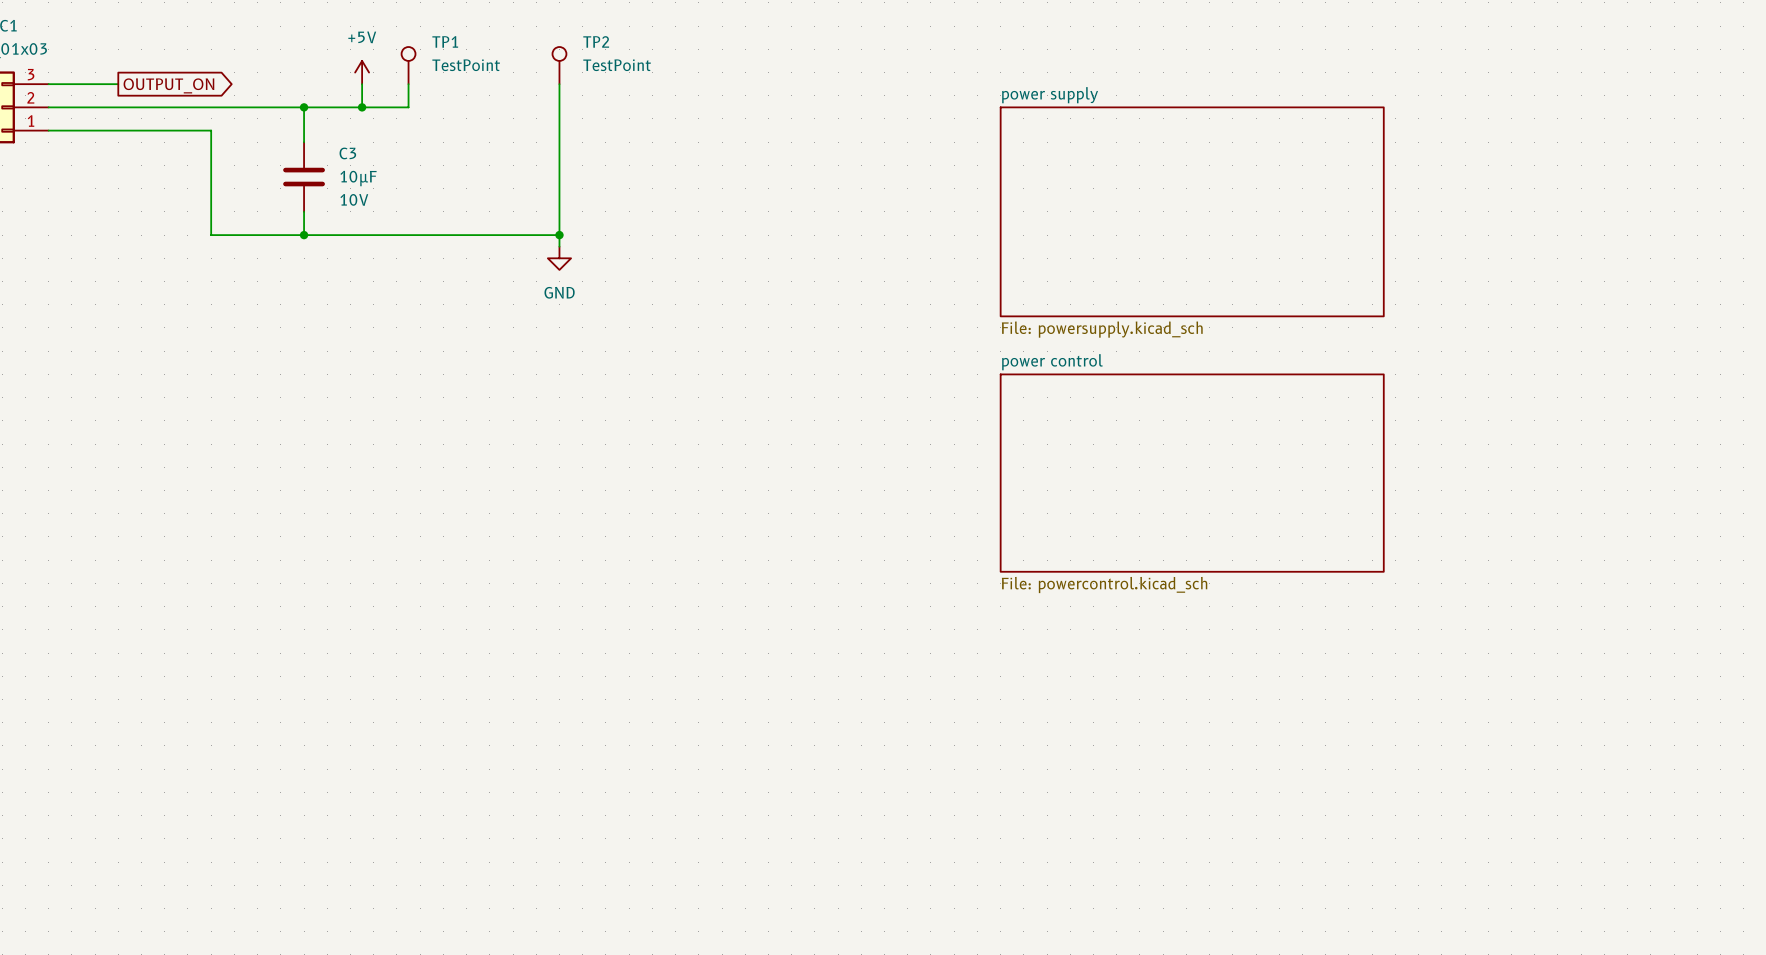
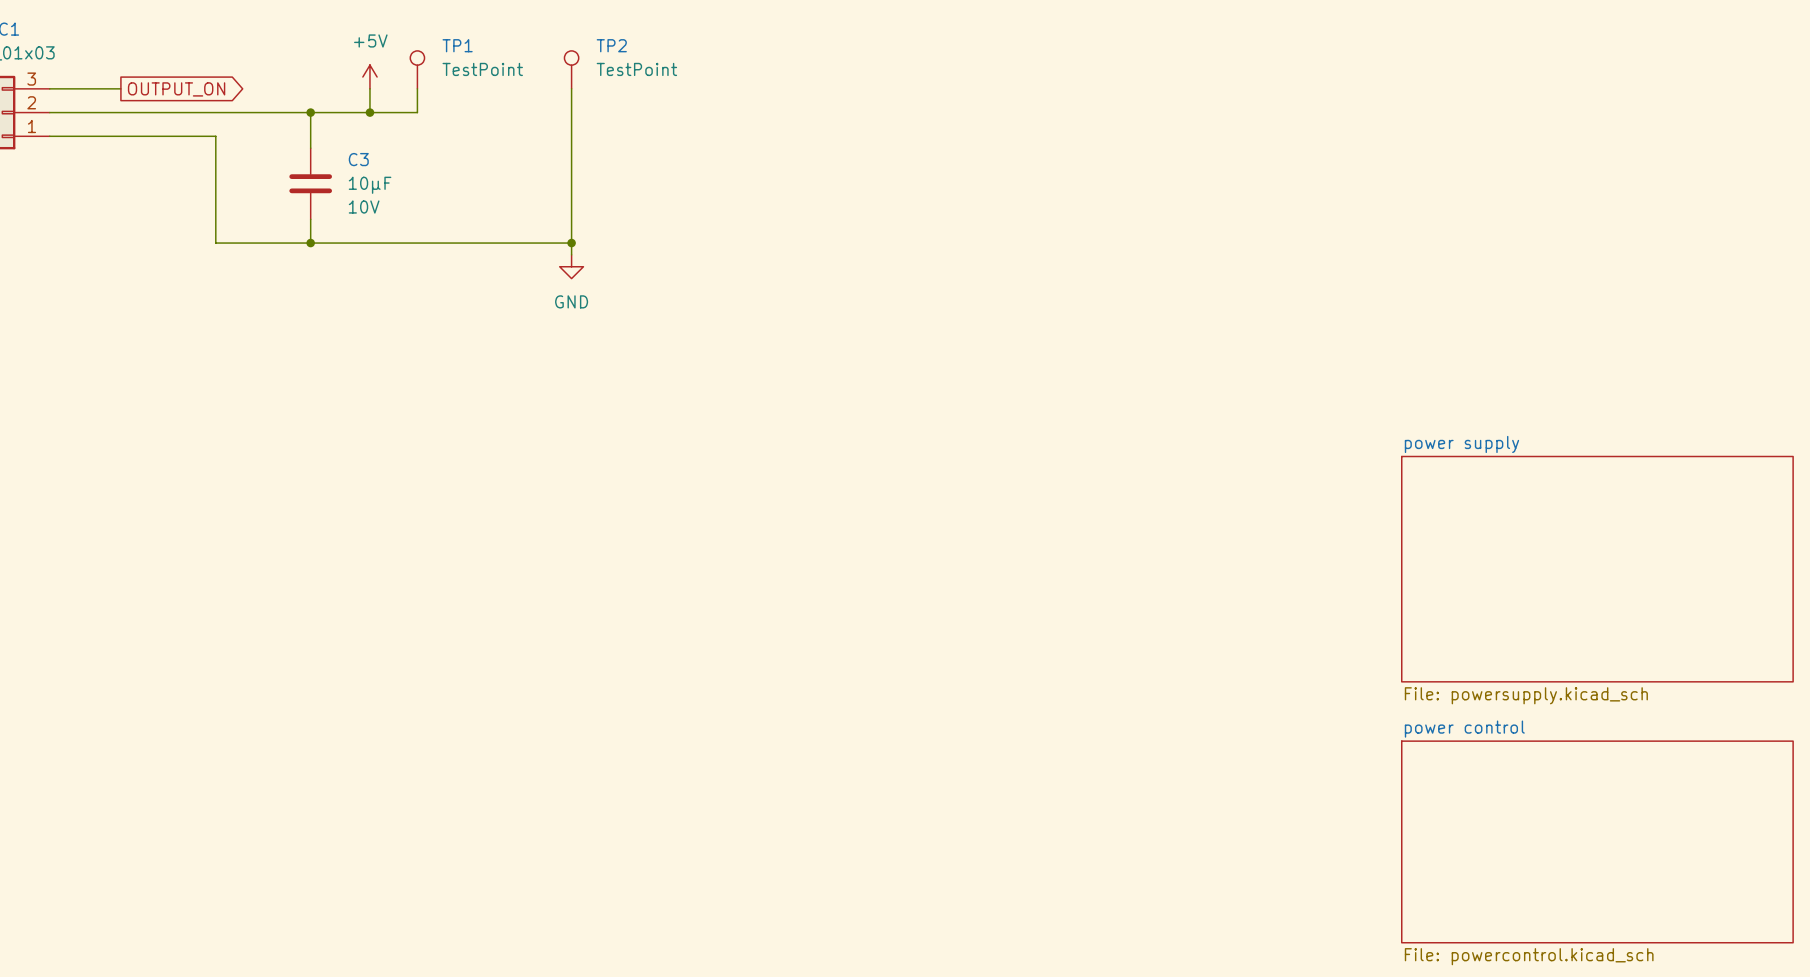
sheet power supply: File: powersupply.kicad_sch (1192, 211) -> none
sheet power control: File: powercontrol.kicad_sch (1192, 473) -> none
sheet power supply: none -> File: powersupply.kicad_sch (1597, 569)
sheet power control: none -> File: powercontrol.kicad_sch (1597, 841)

